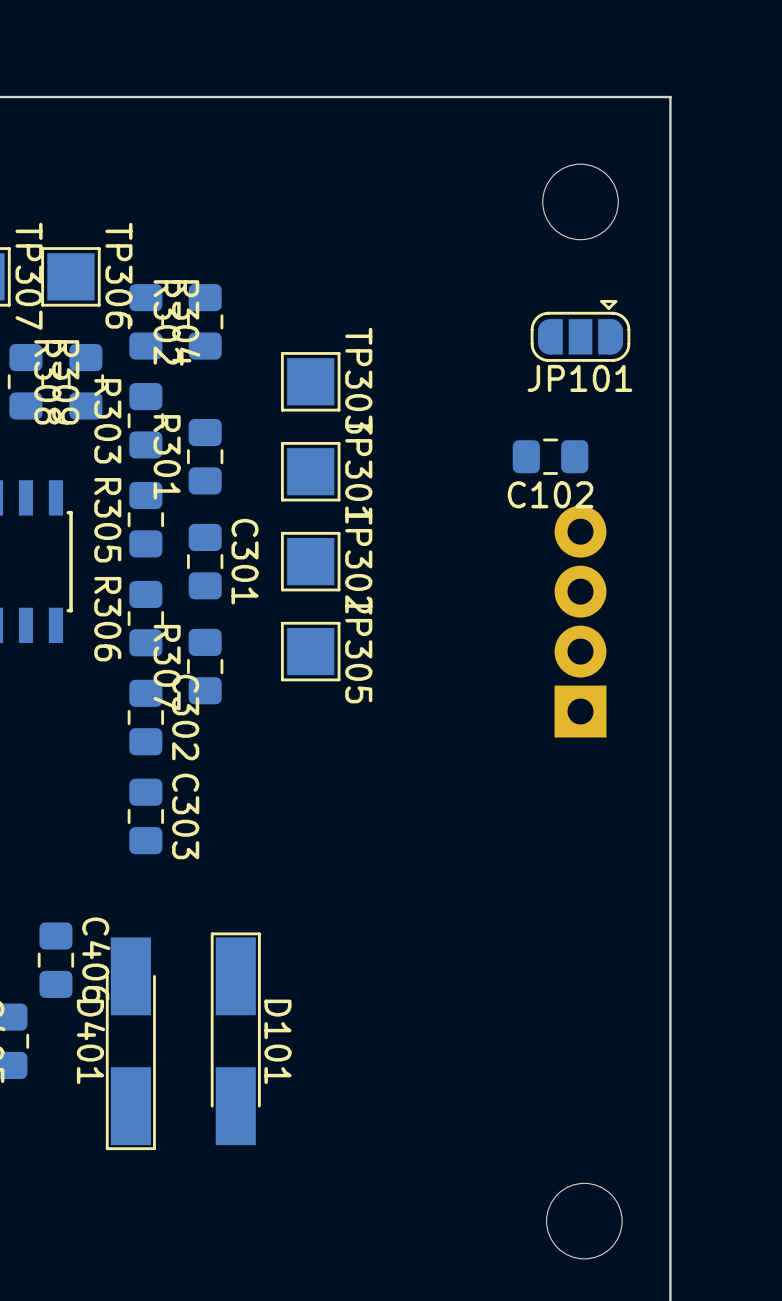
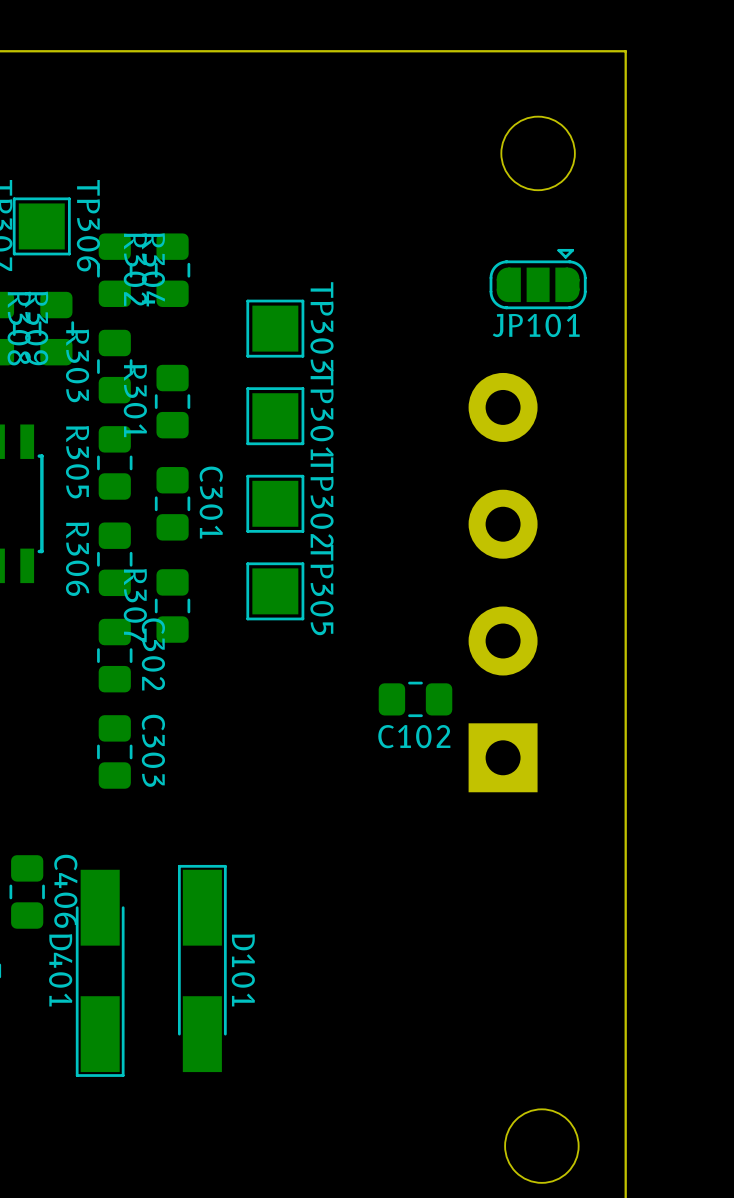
C102 position: (550, 456) -> (415, 699)
part: (580, 621) -> none
part: none -> (503, 582)

